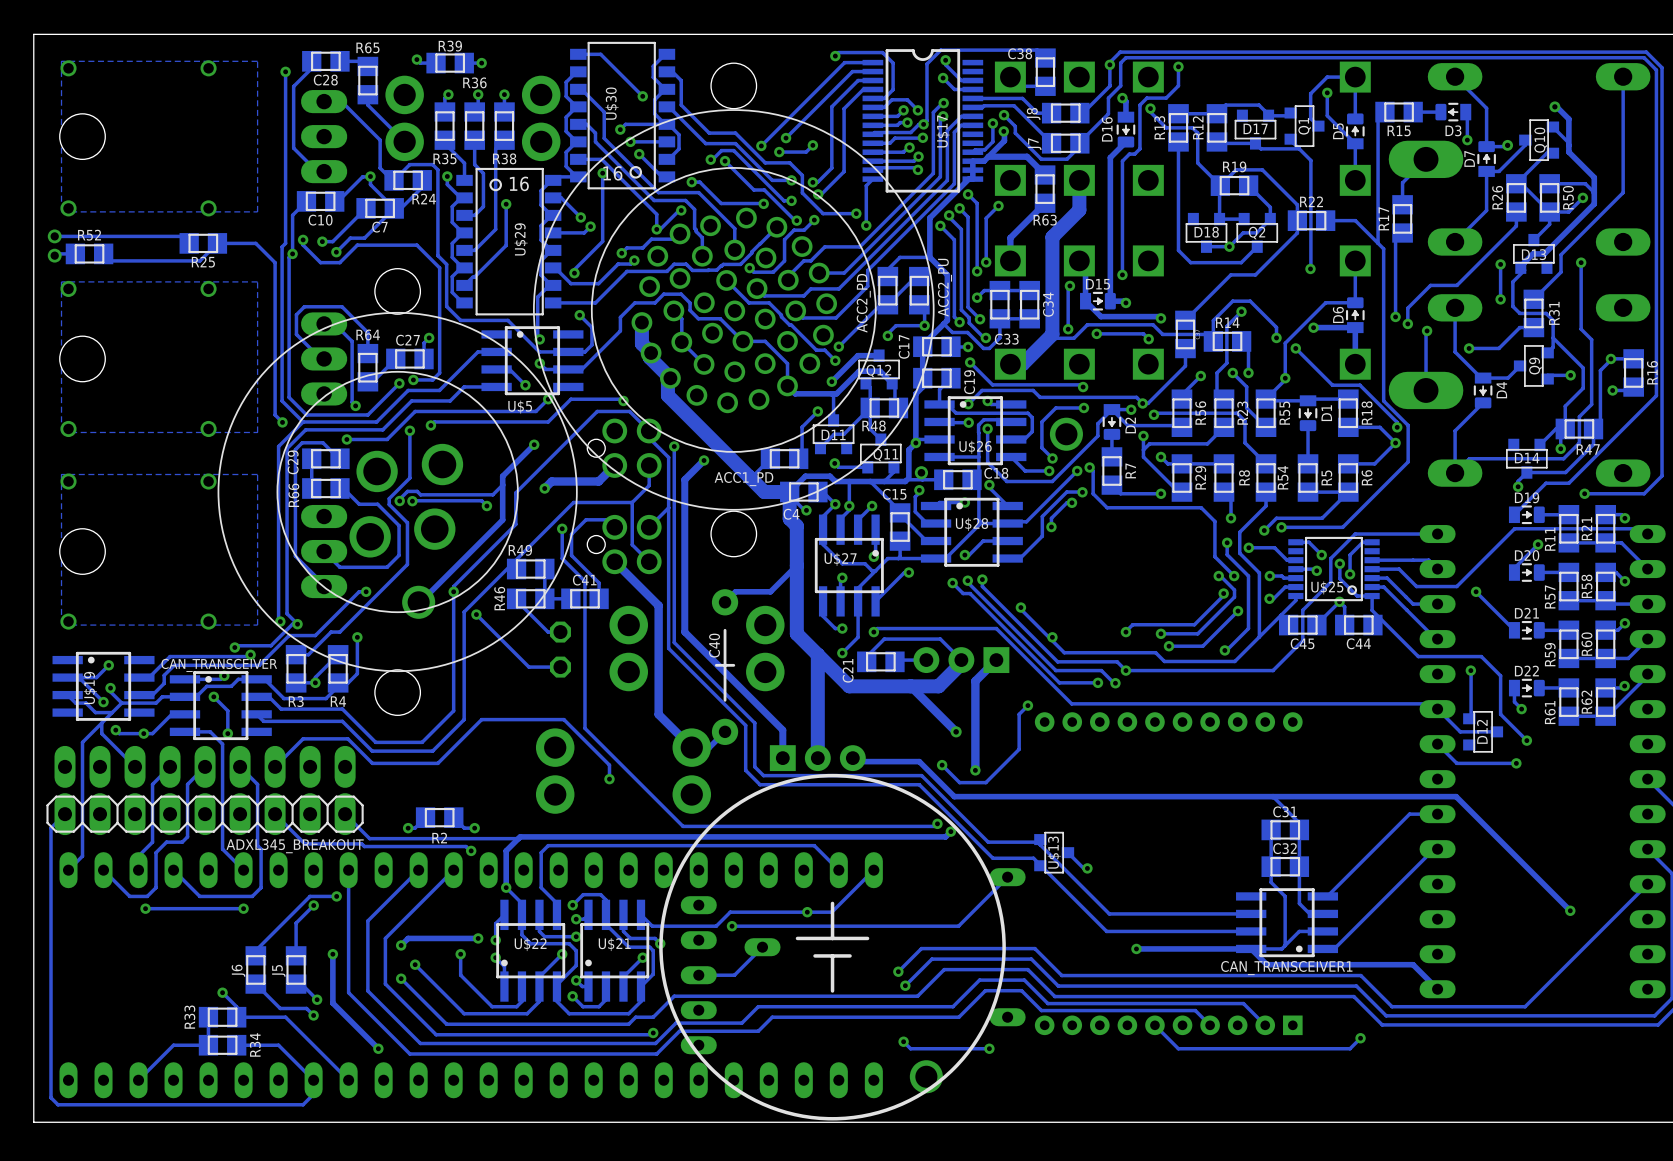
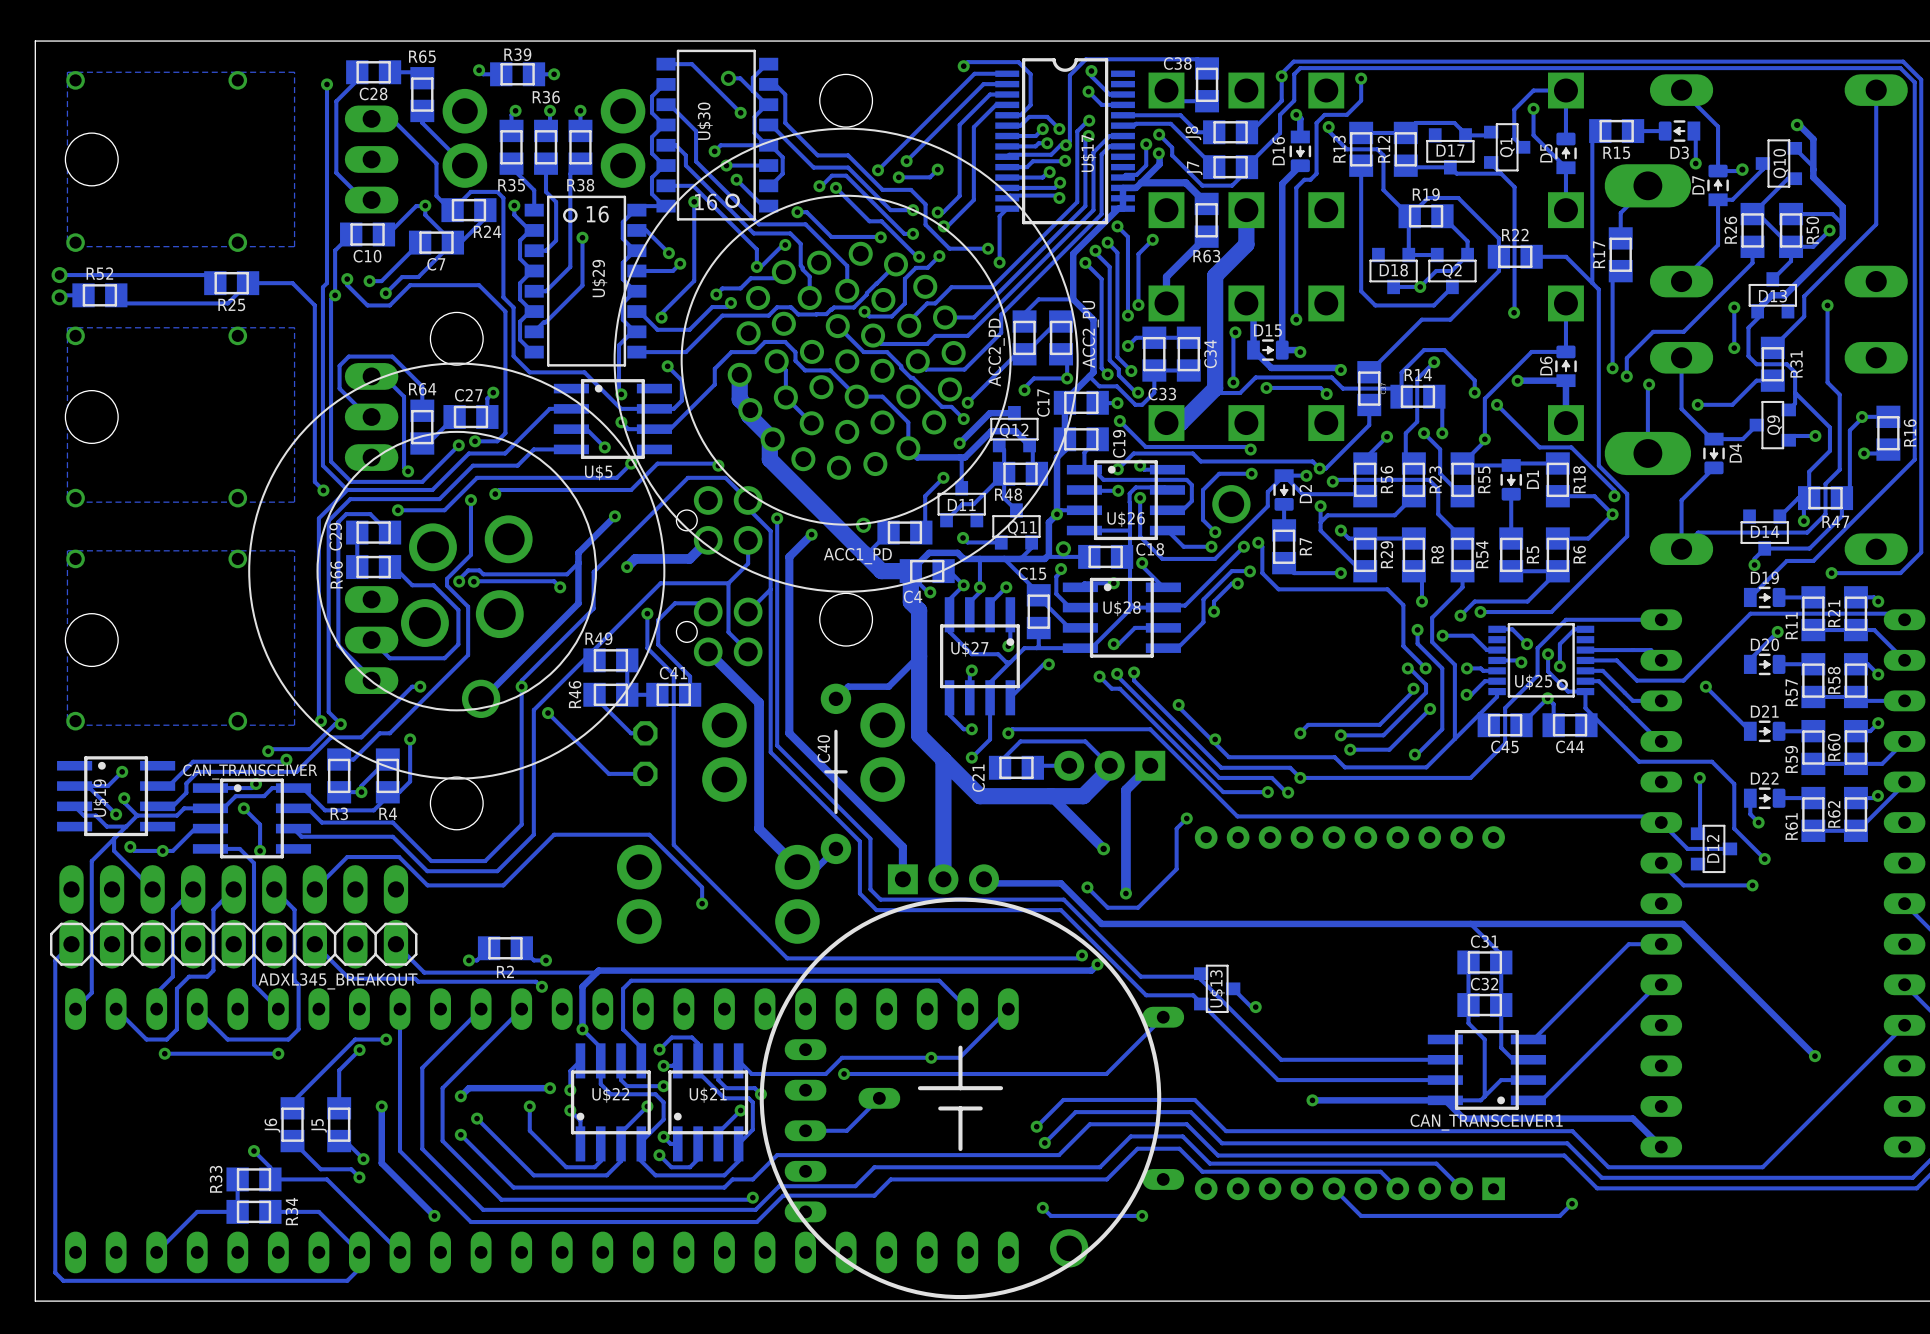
track: none -> (728, 78) (740, 78) (752, 90)
via: none -> (728, 78)
via: none -> (863, 525)

